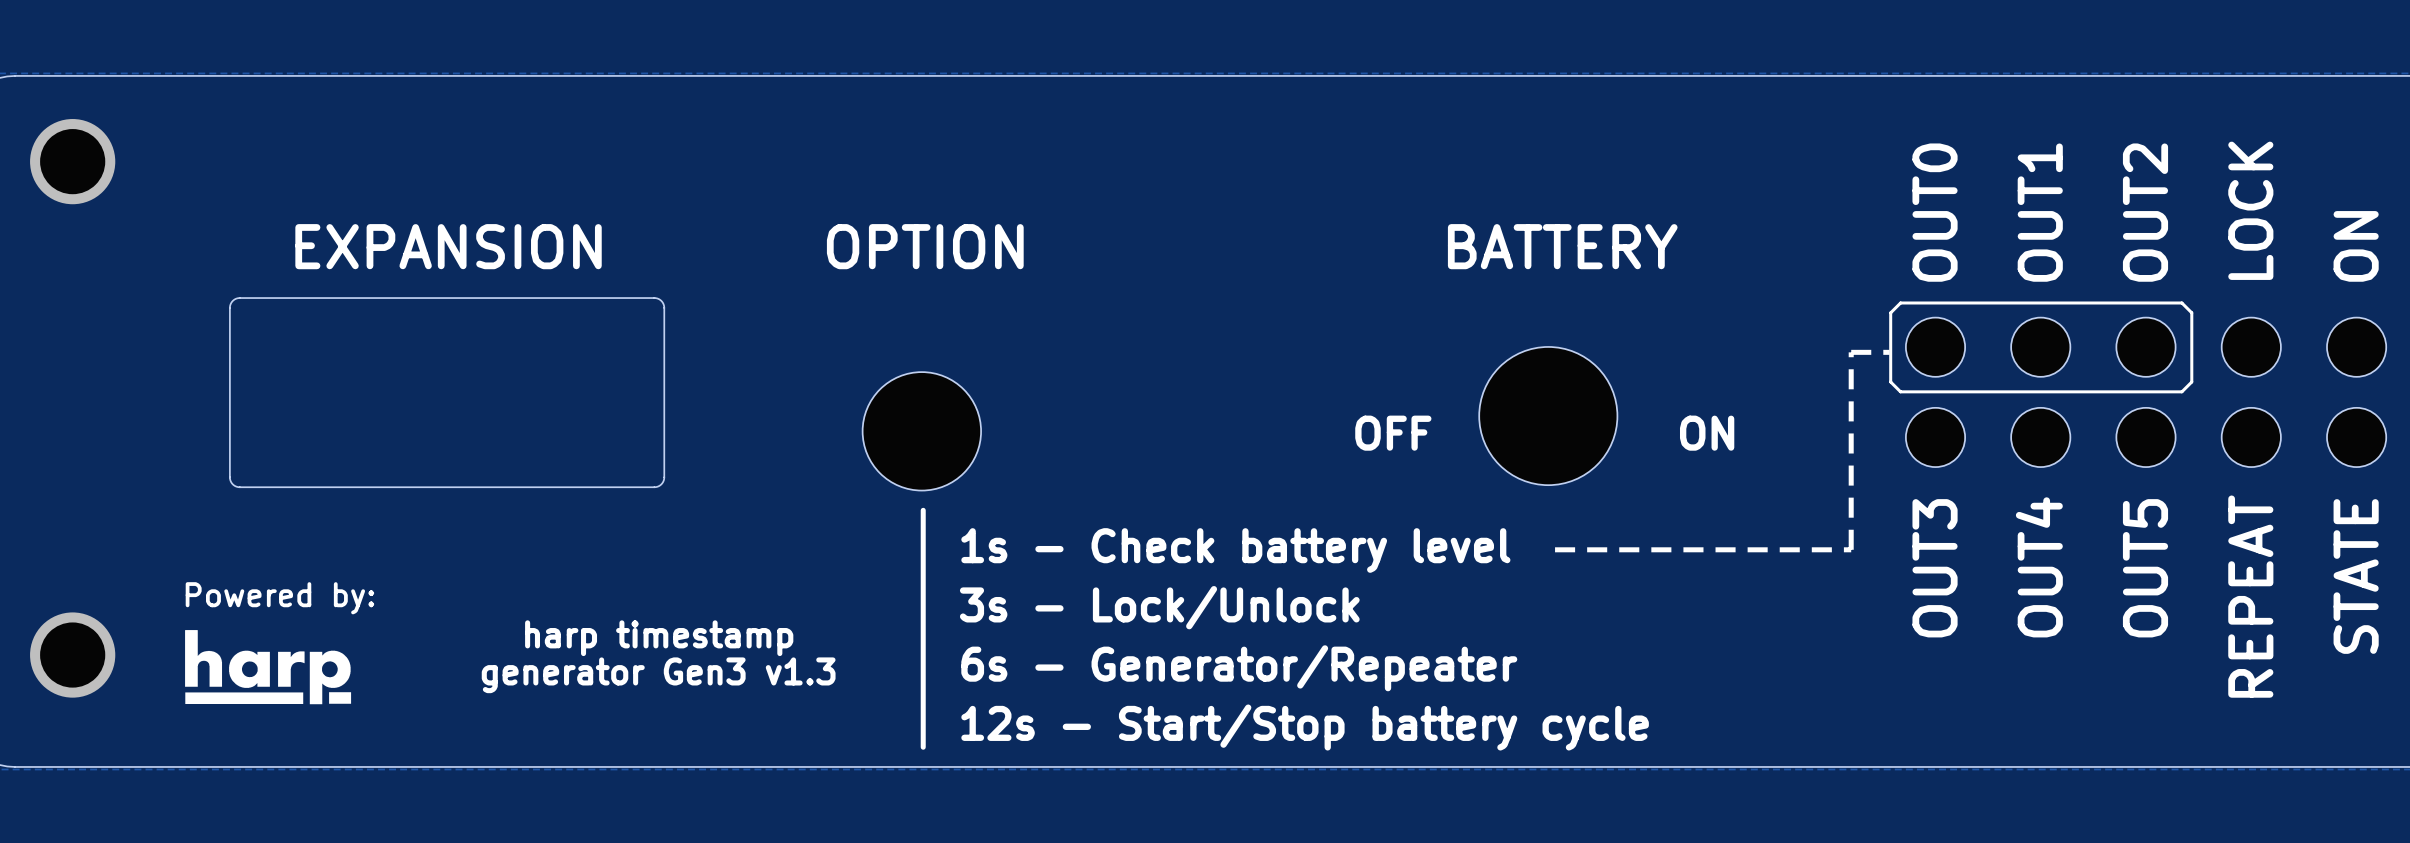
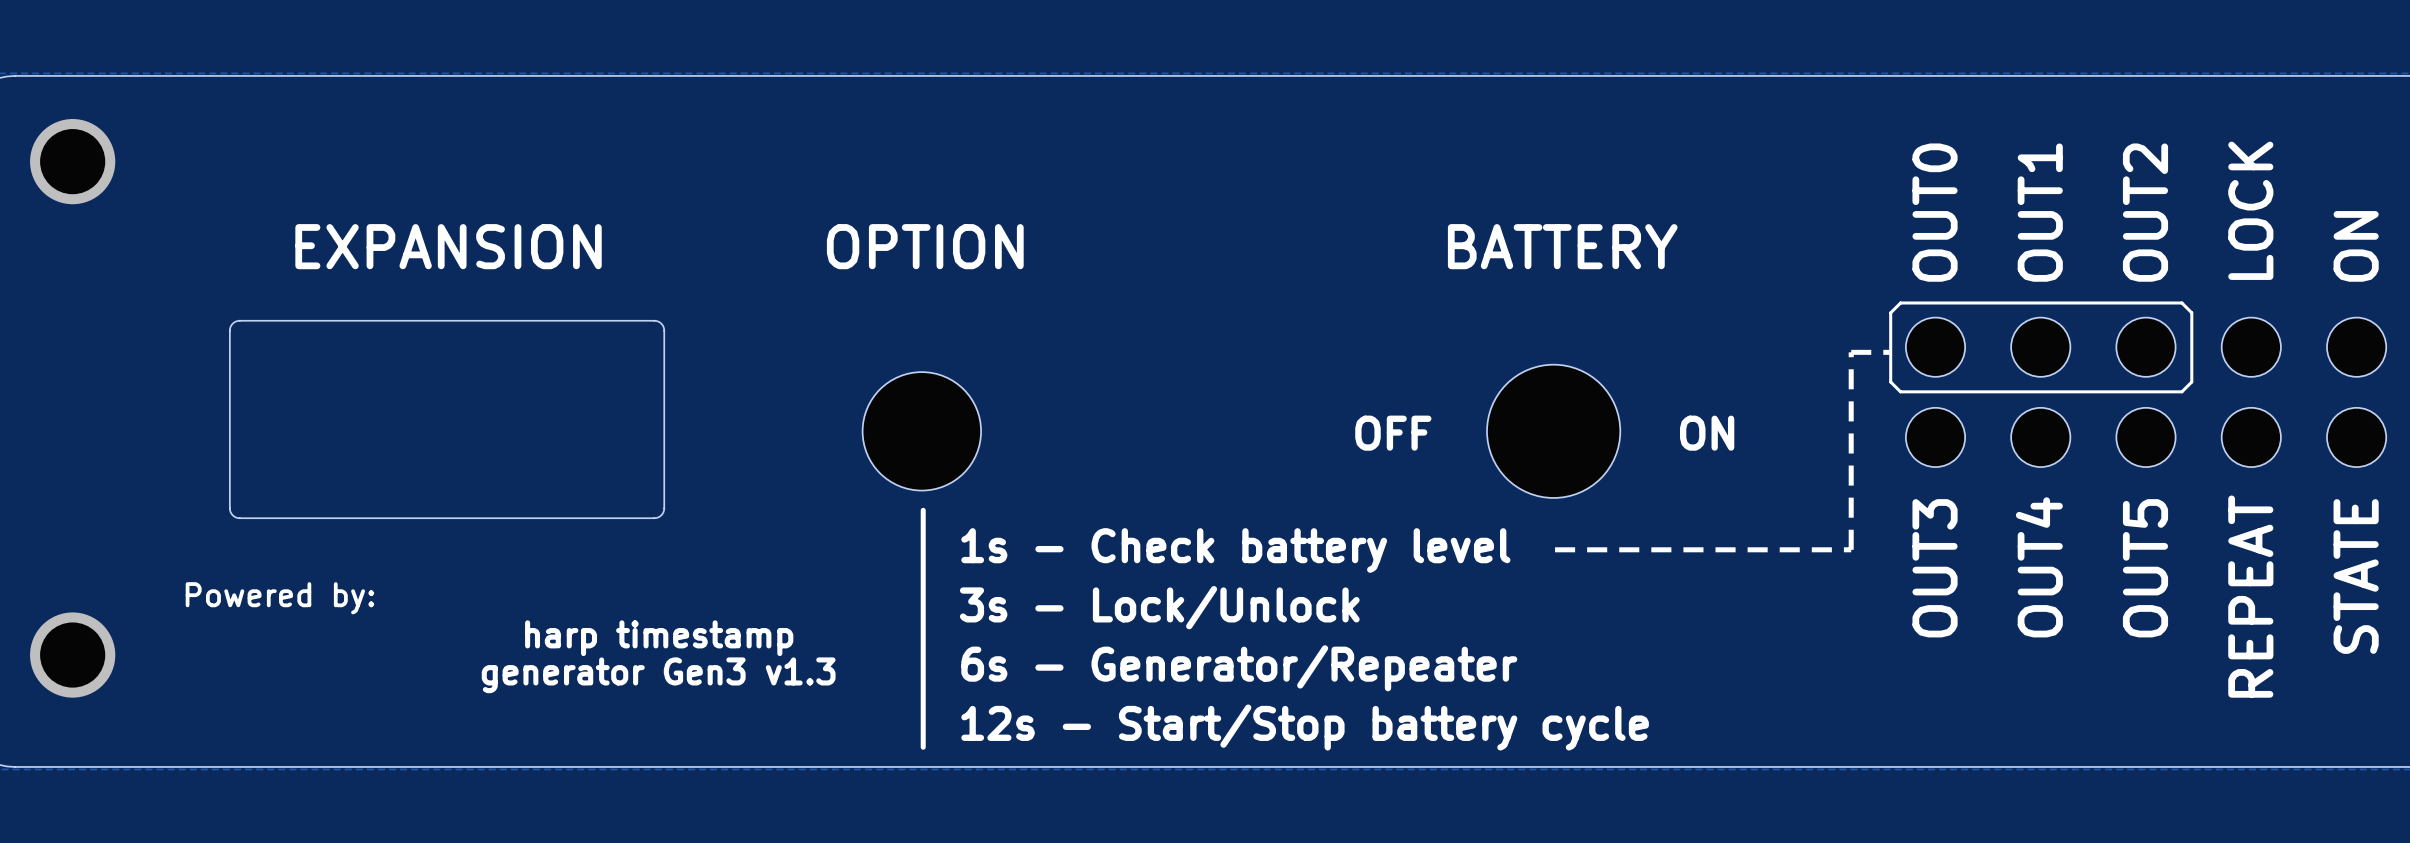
board edge: (239, 298) (658, 298) (662, 302) (664, 307) (663, 481) (659, 485) (654, 487) (236, 486) (231, 483) (229, 477) (229, 307) (232, 300) (239, 298) -> (239, 320) (232, 323) (229, 330) (229, 508) (231, 513) (235, 517) (654, 518) (659, 516) (663, 512) (664, 330) (662, 324) (658, 321) (239, 320)
part footprint: [1479, 346, 1618, 486] -> [1487, 364, 1621, 498]
drawing: [185, 630, 352, 705] -> none

